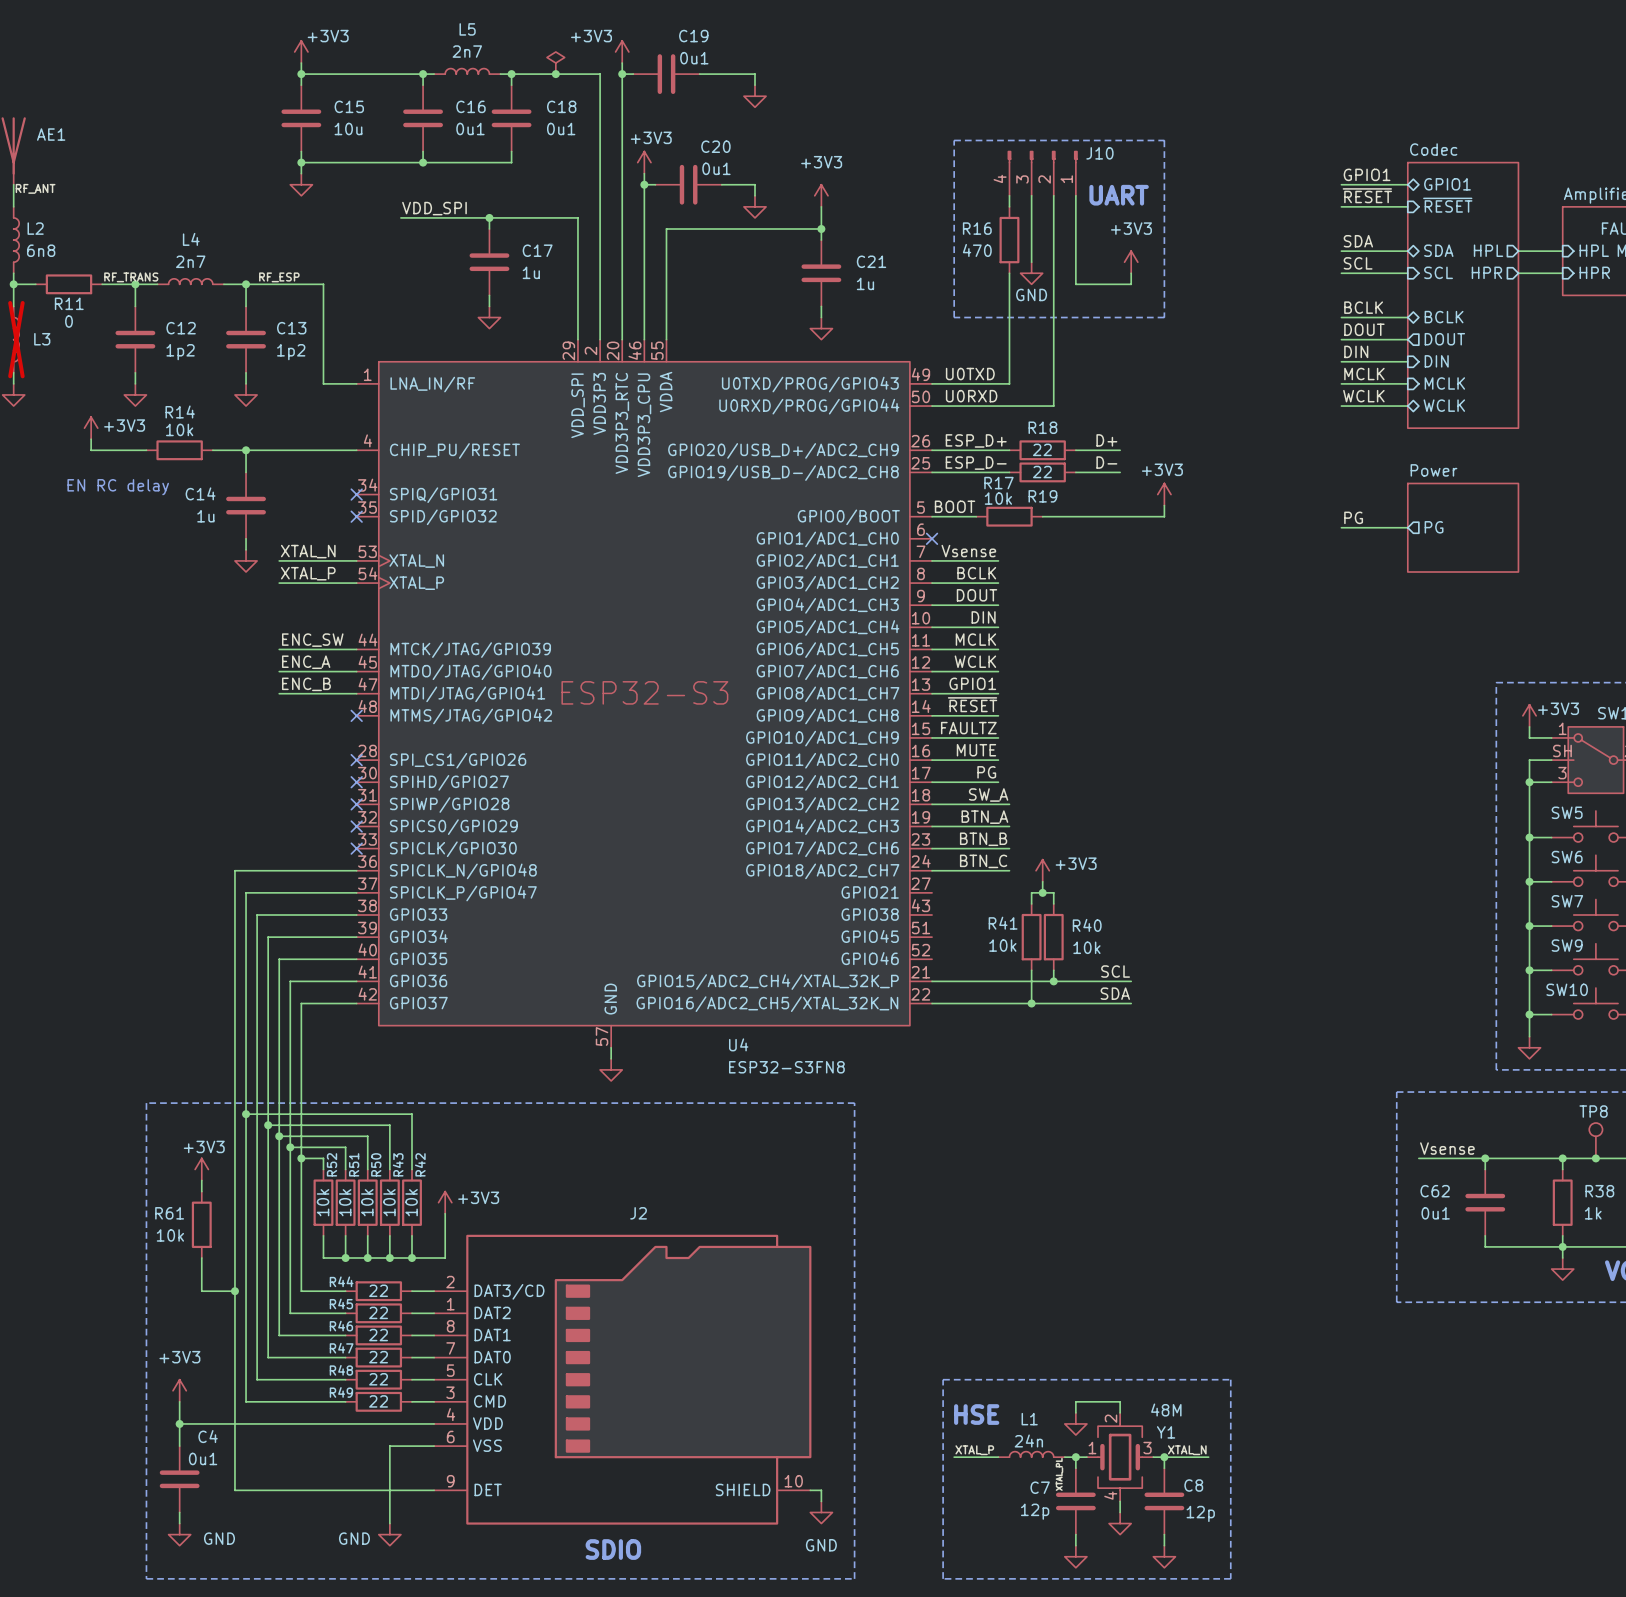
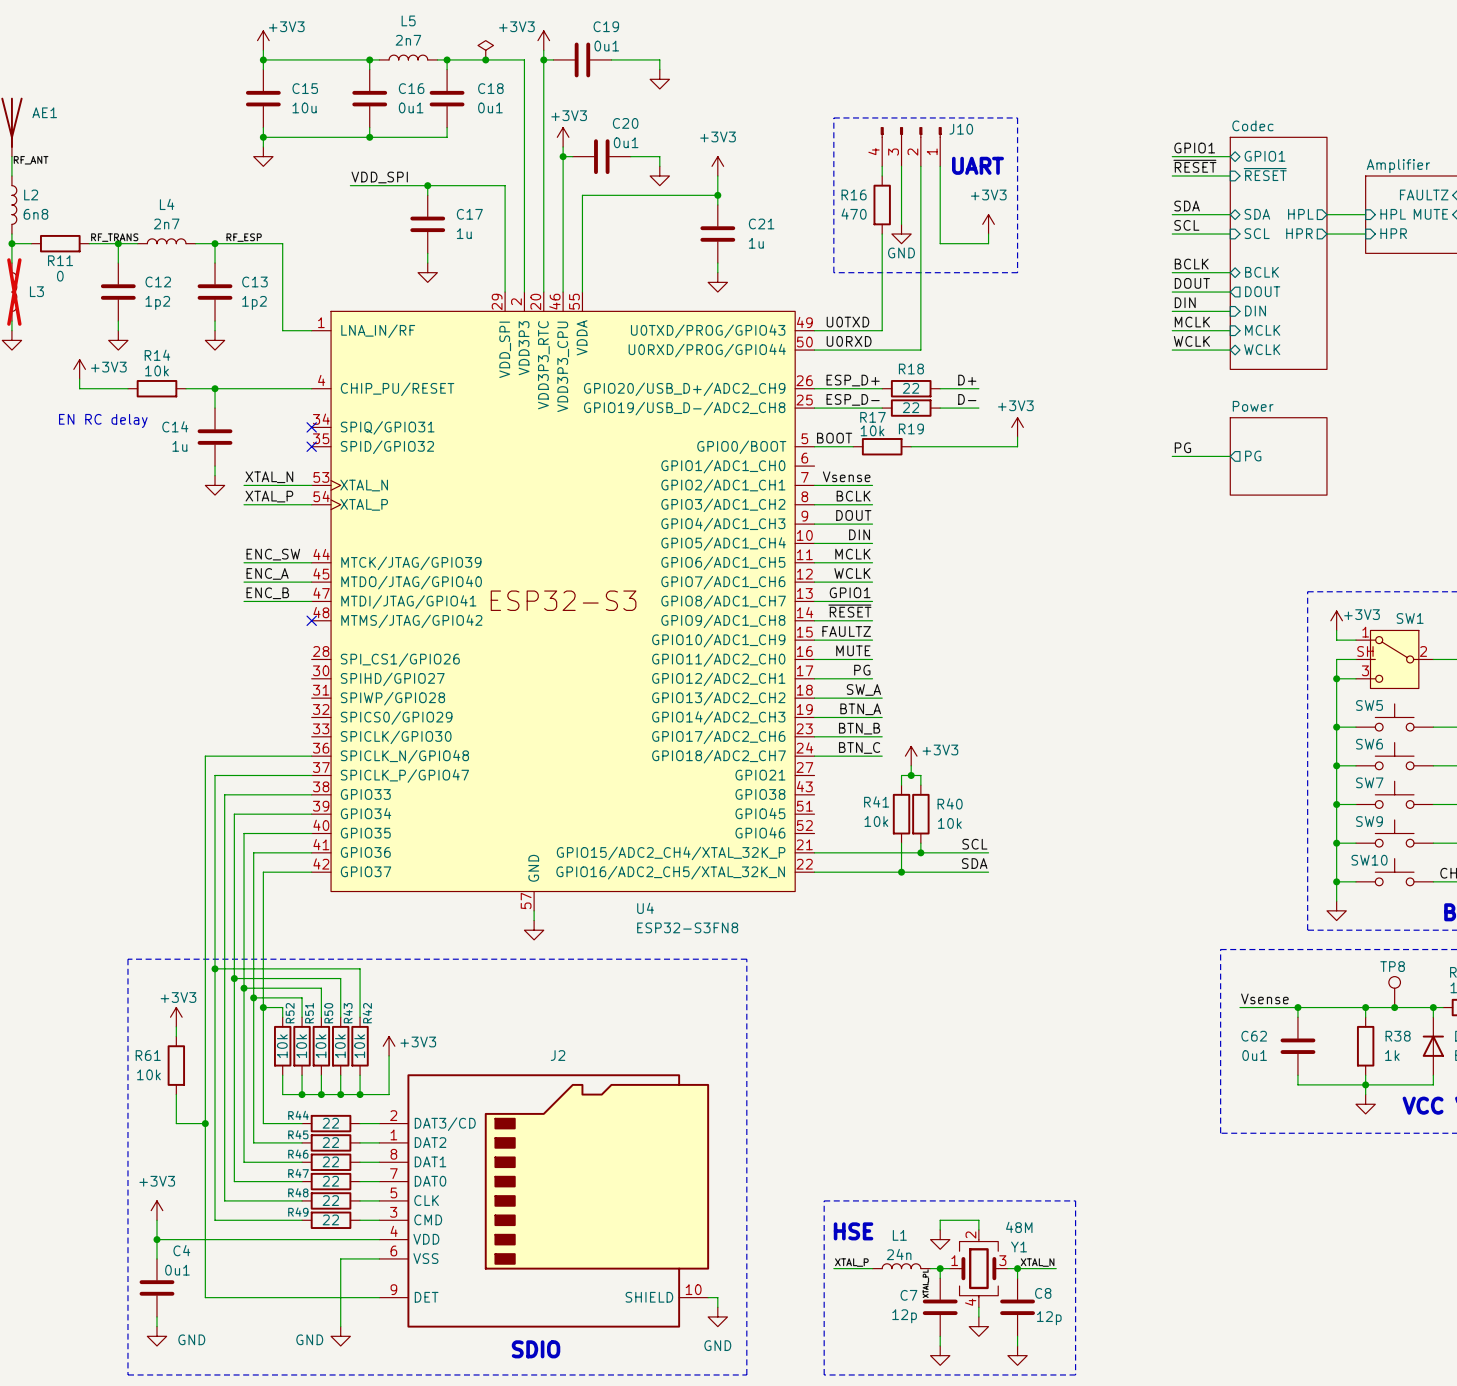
no-connect mark: (932, 538) -> none
no-connect mark: (356, 760) -> none
no-connect mark: (356, 782) -> none
no-connect mark: (356, 804) -> none
no-connect mark: (356, 826) -> none
no-connect mark: (356, 848) -> none

